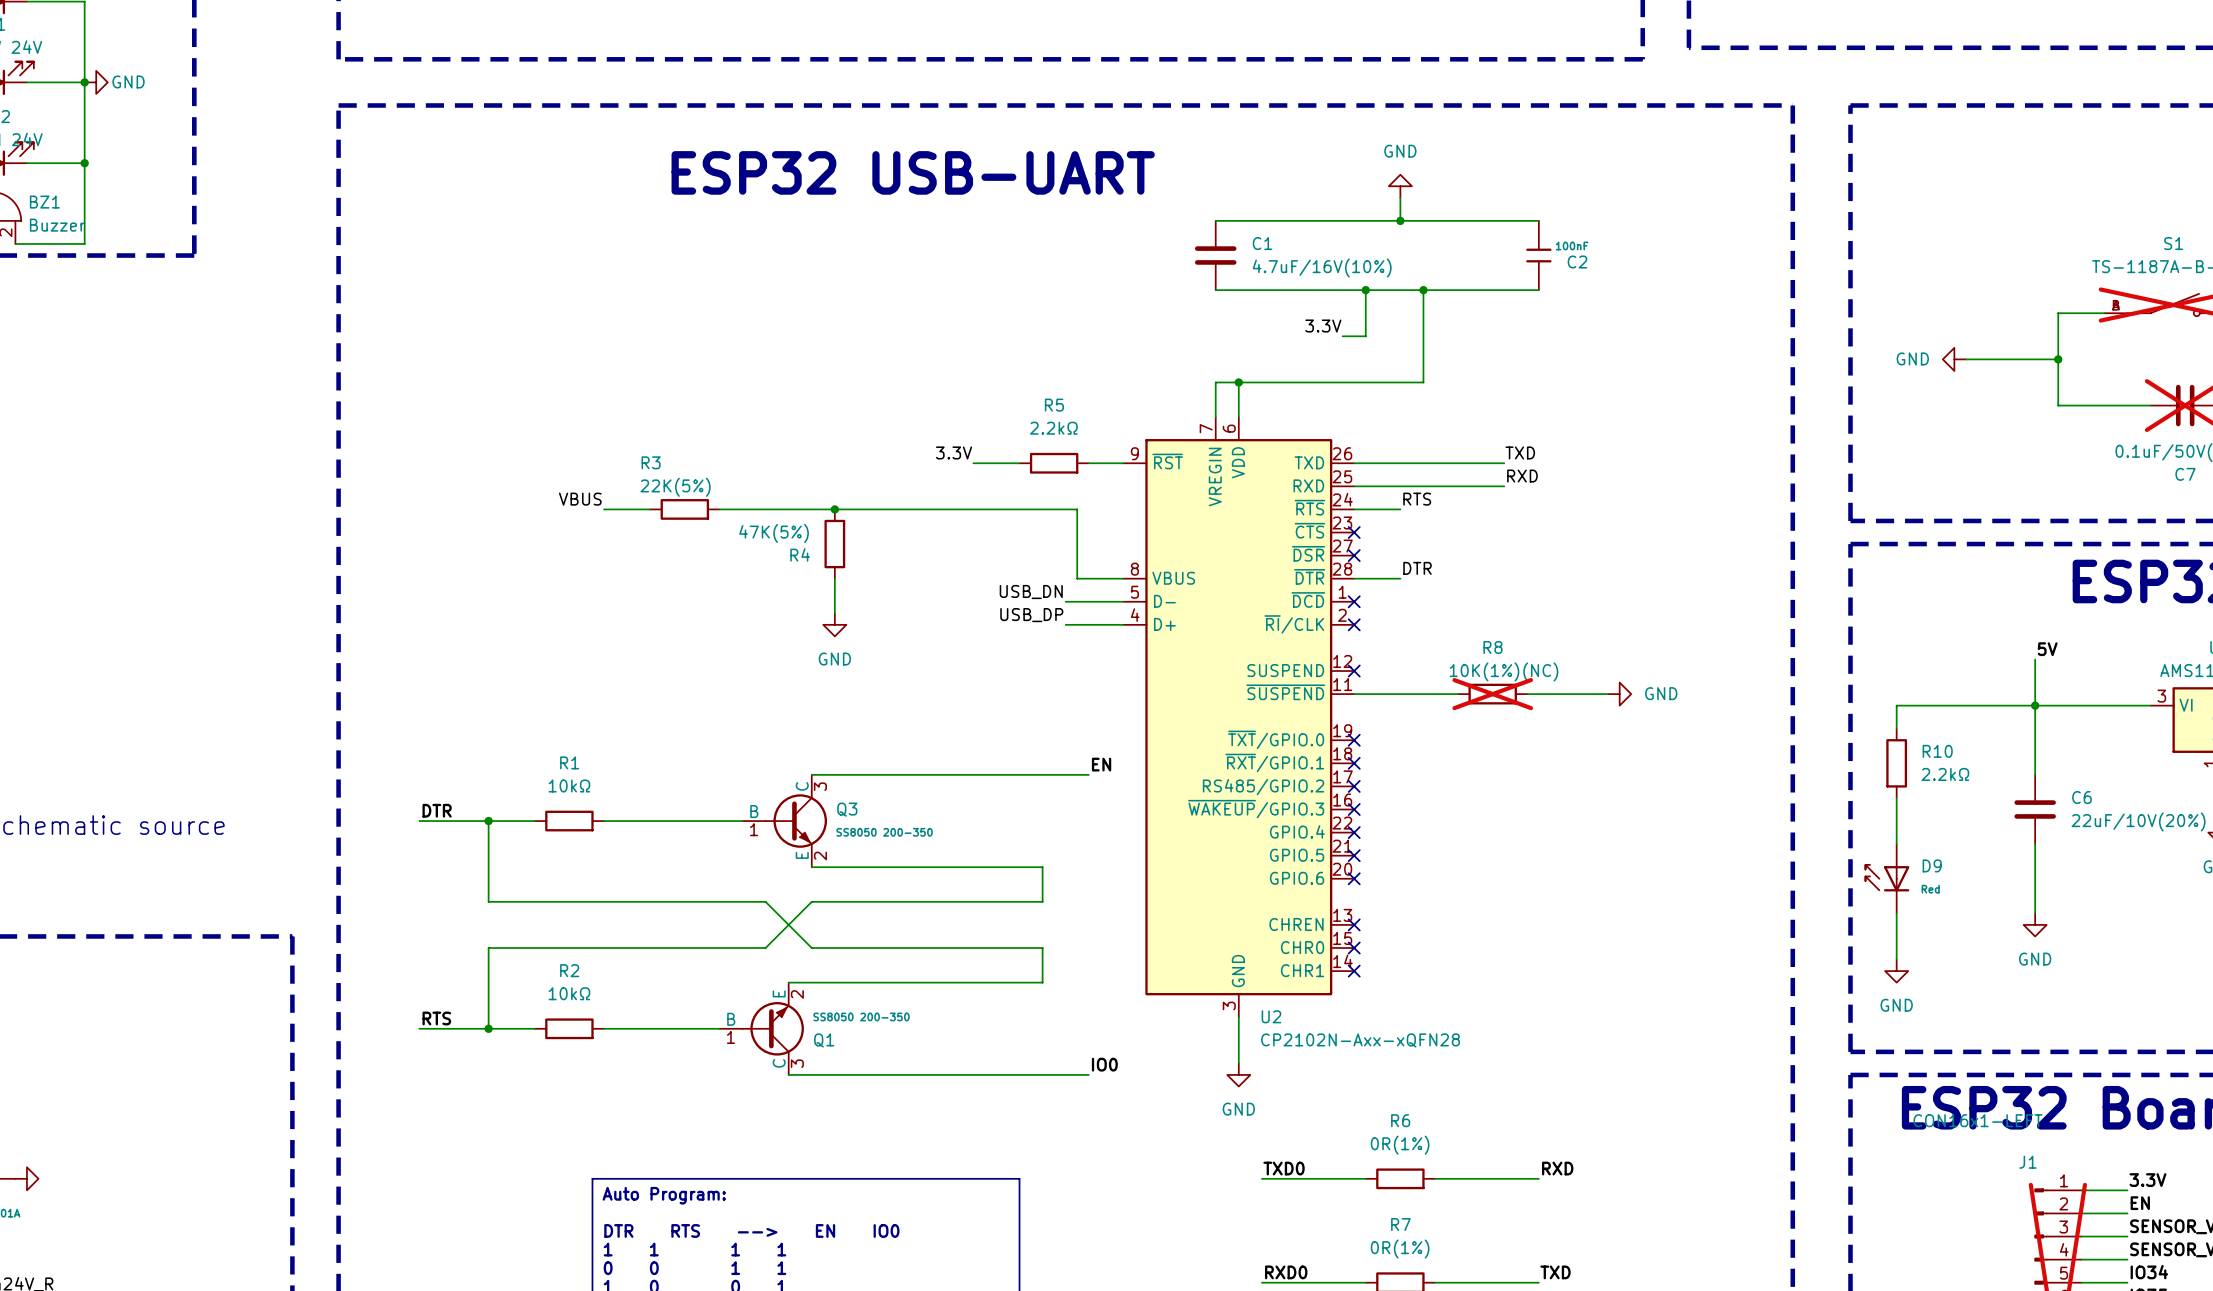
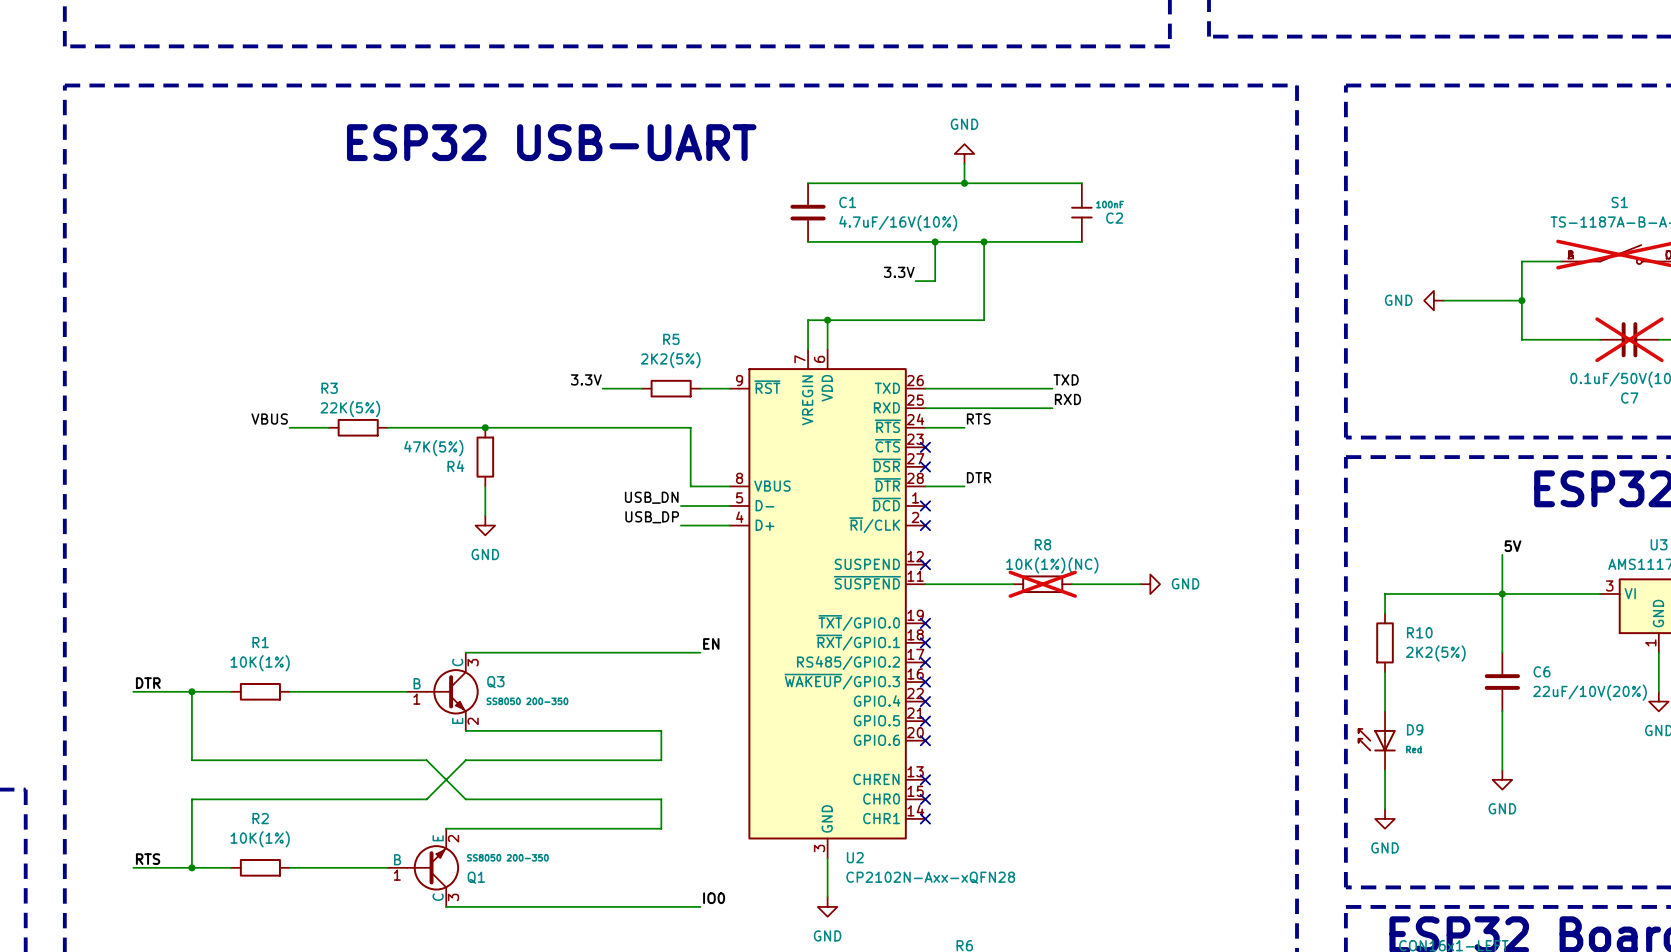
R5 value: 2.2kΩ (1053, 428) -> 2K2(5%) (670, 360)
R10 value: 2.2kΩ (1945, 774) -> 2K2(5%) (1435, 653)
R1 value: 10kΩ (569, 785) -> 10K(1%) (260, 663)
R2 value: 10kΩ (569, 993) -> 10K(1%) (260, 839)

